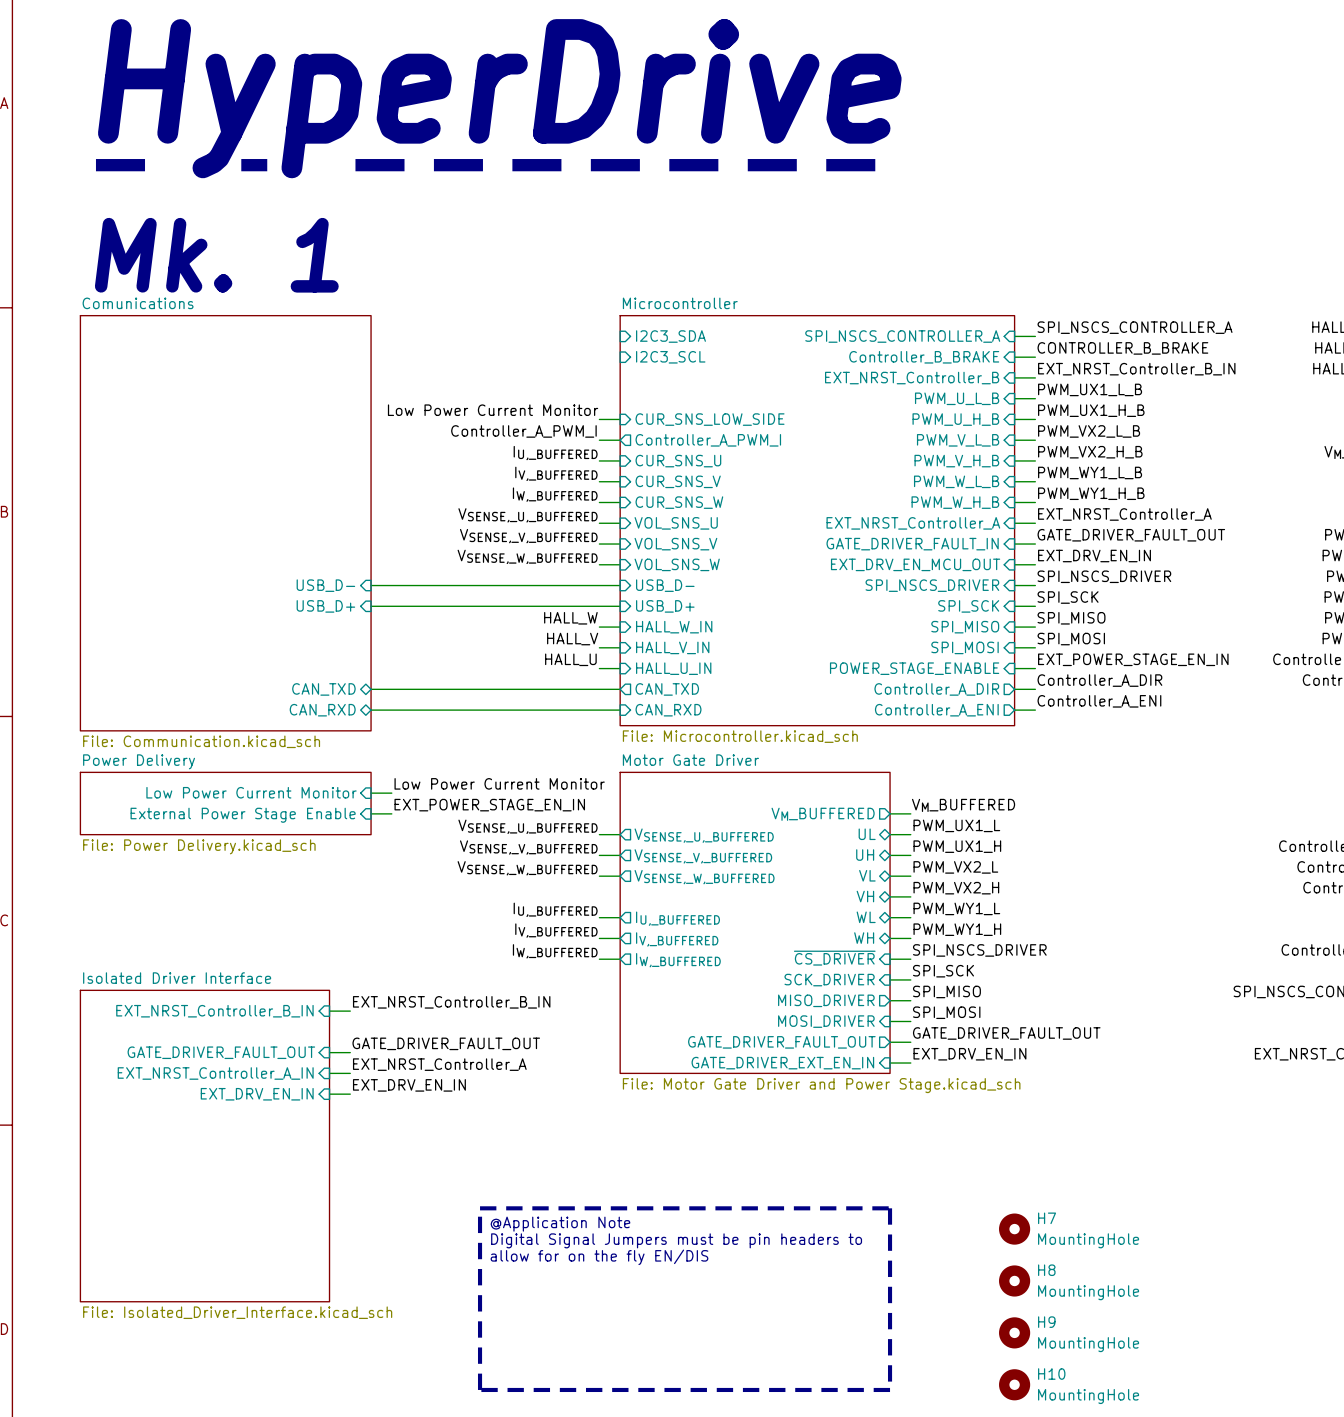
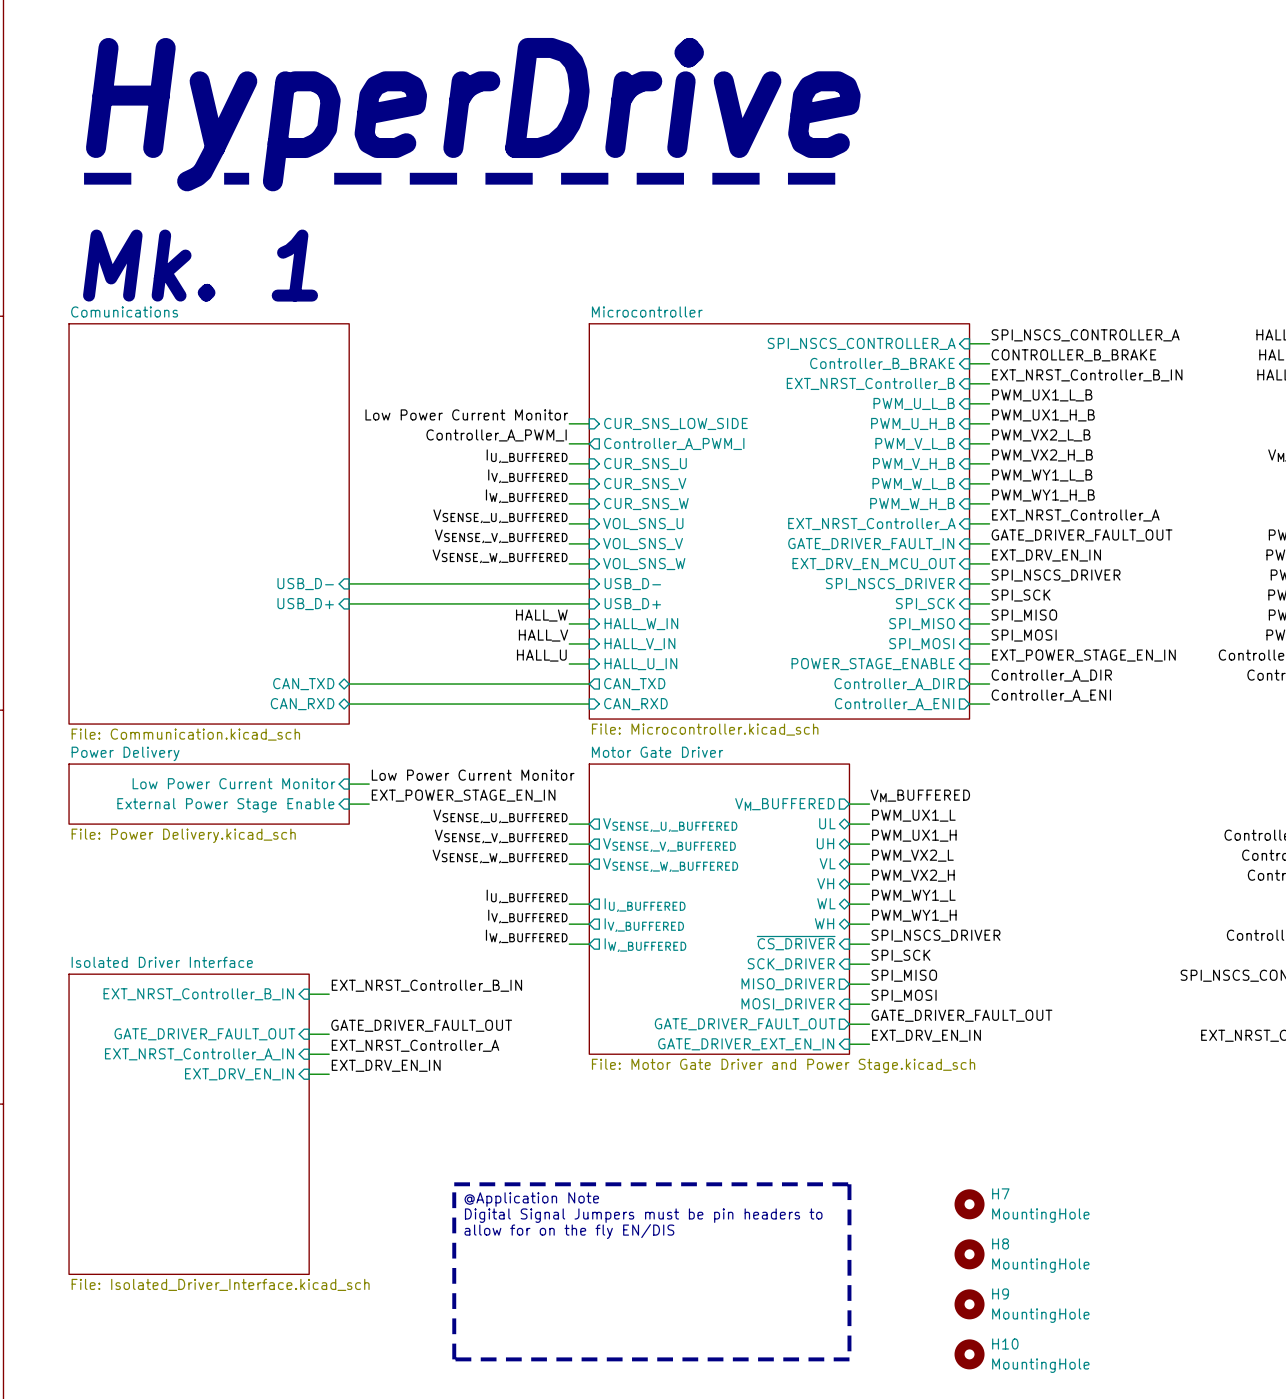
sheet pin: I2C3_SDA (670, 336) -> none
sheet pin: I2C3_SCL (670, 357) -> none

